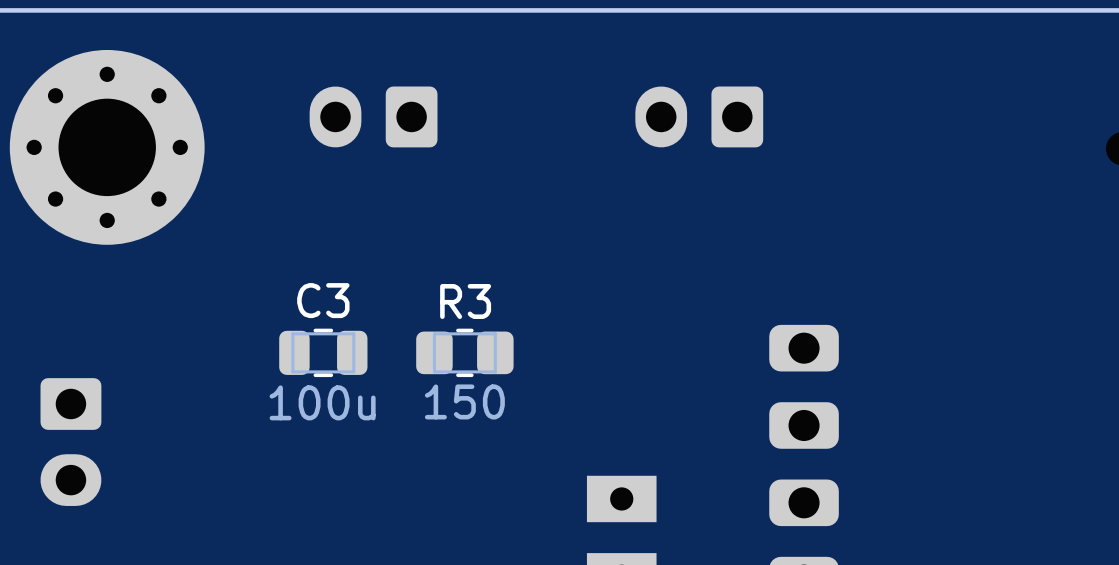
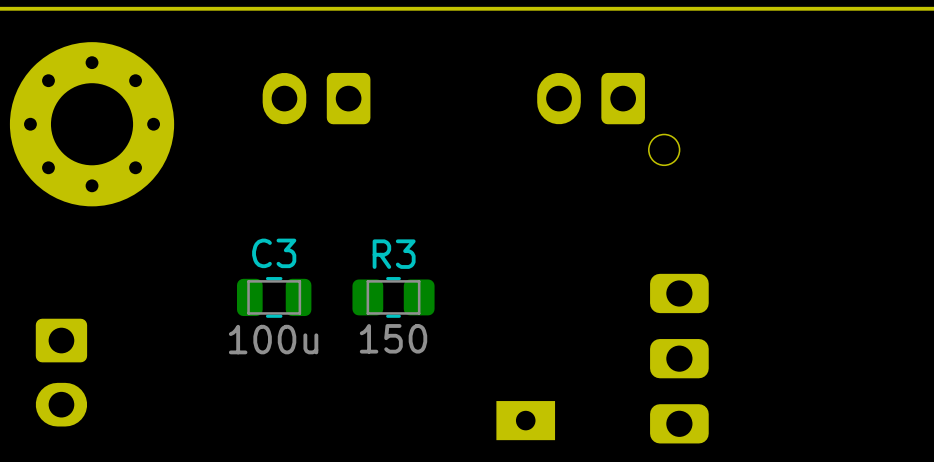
part: none -> (608, 119)

